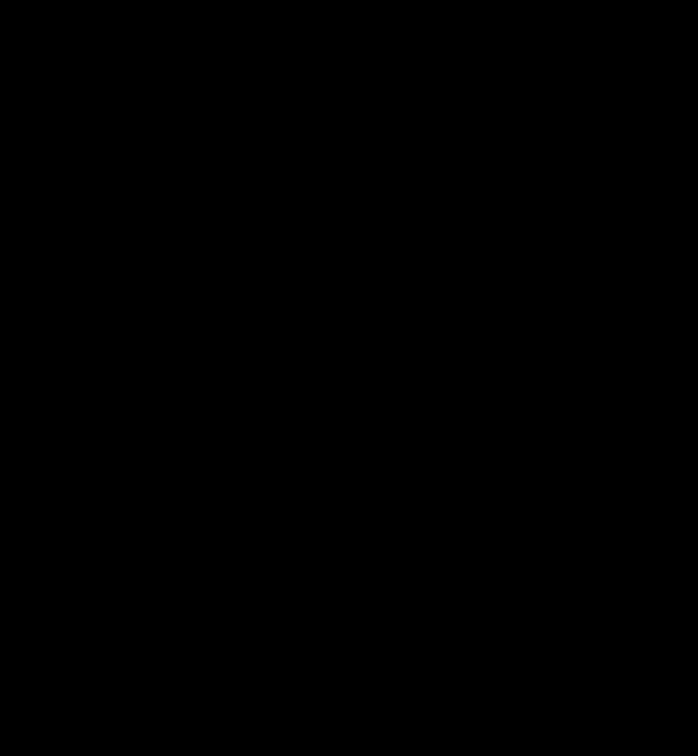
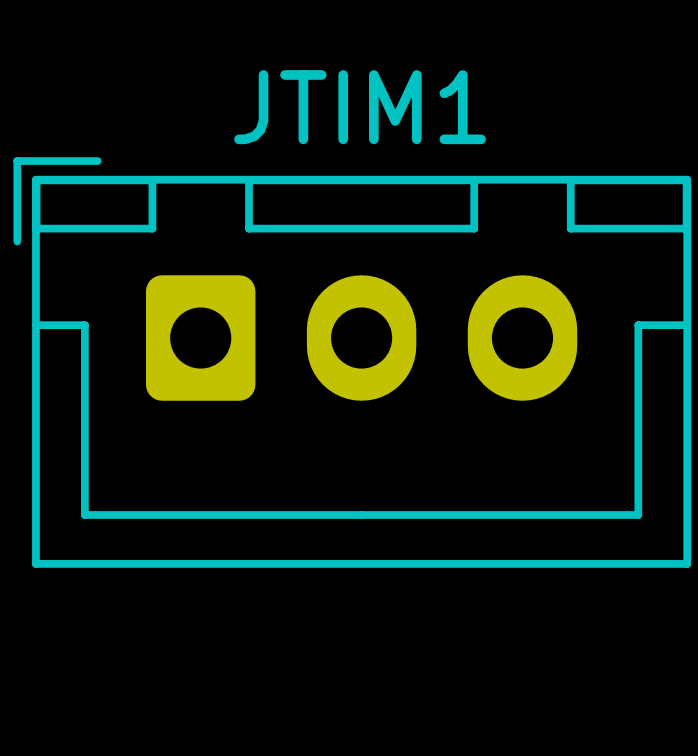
JTIM1: none -> (352, 362)

